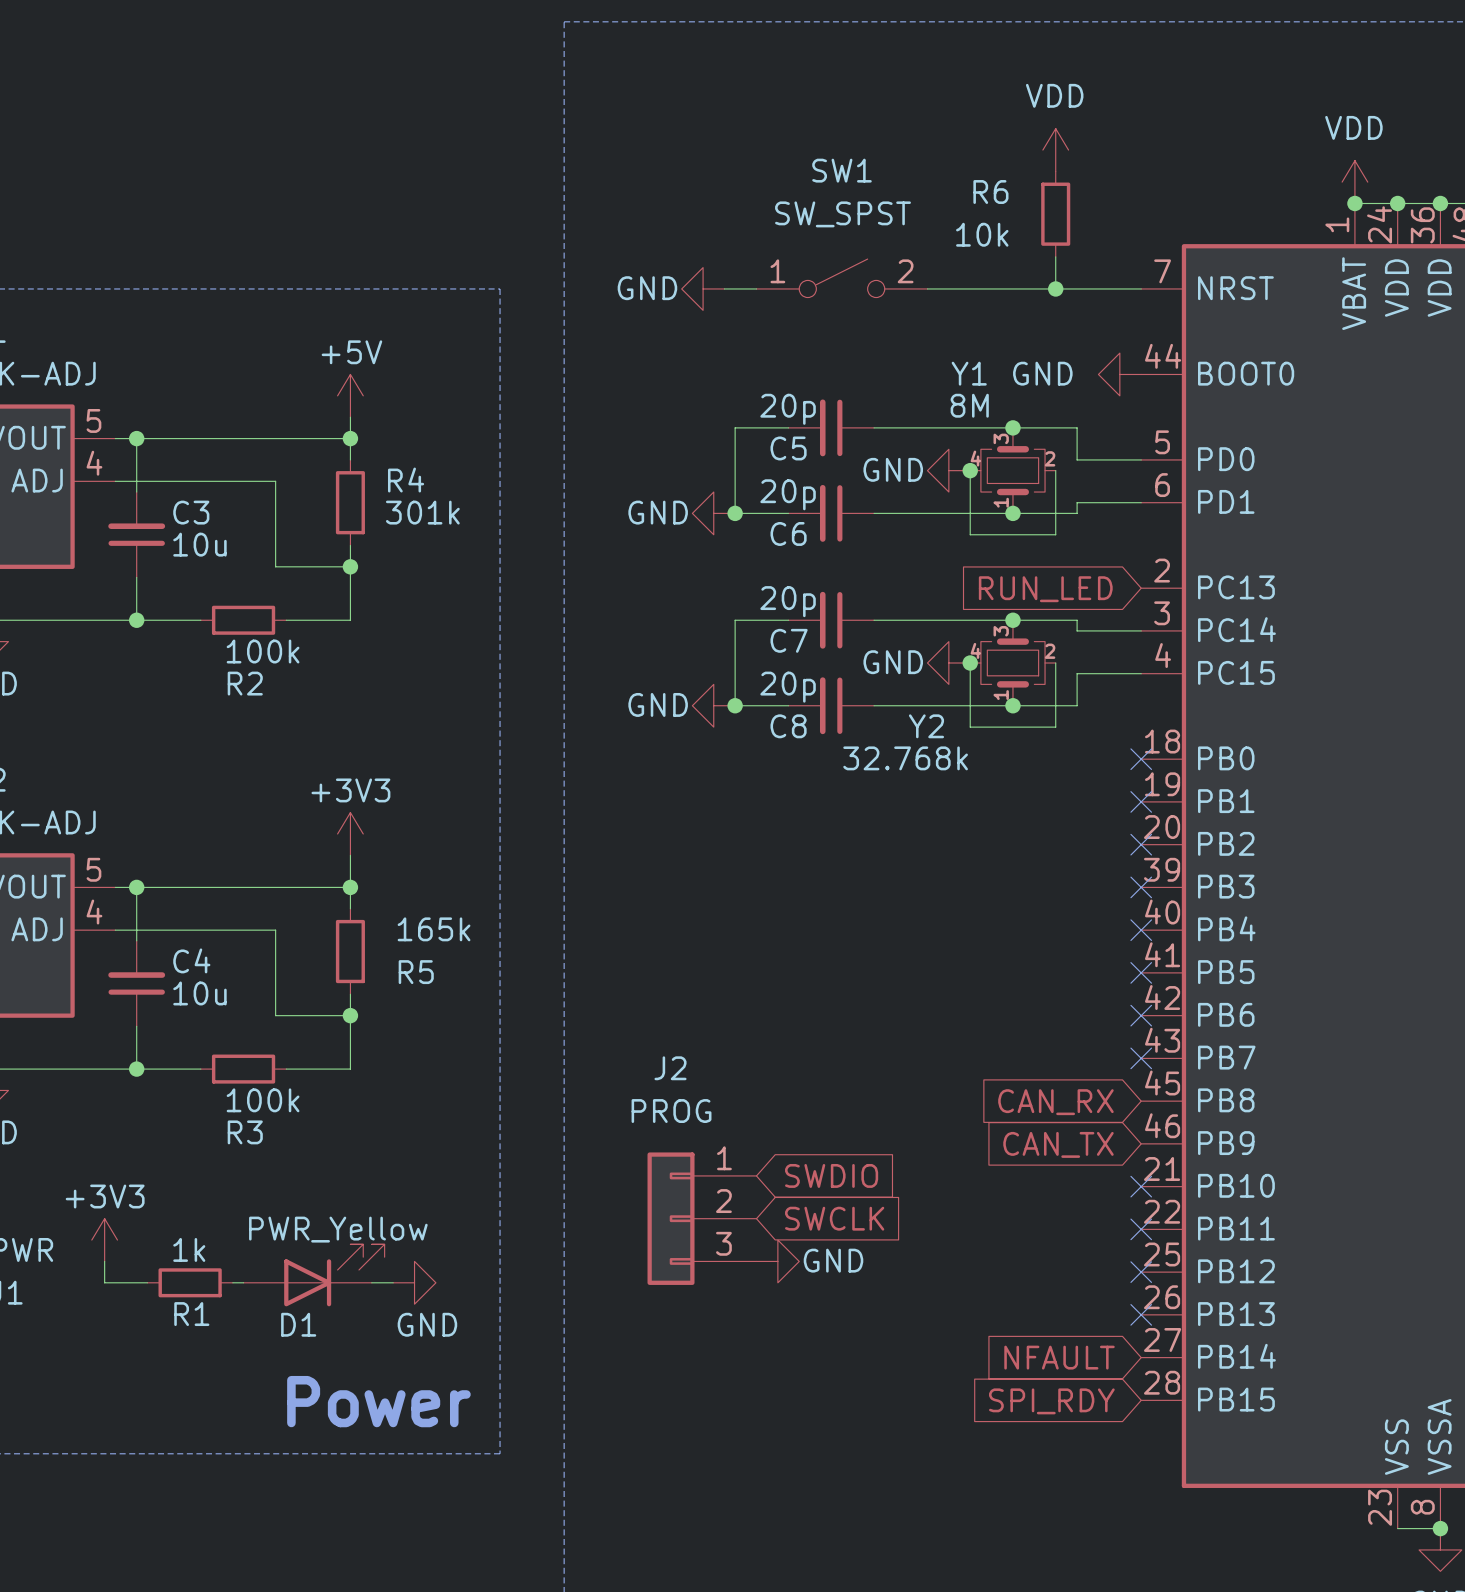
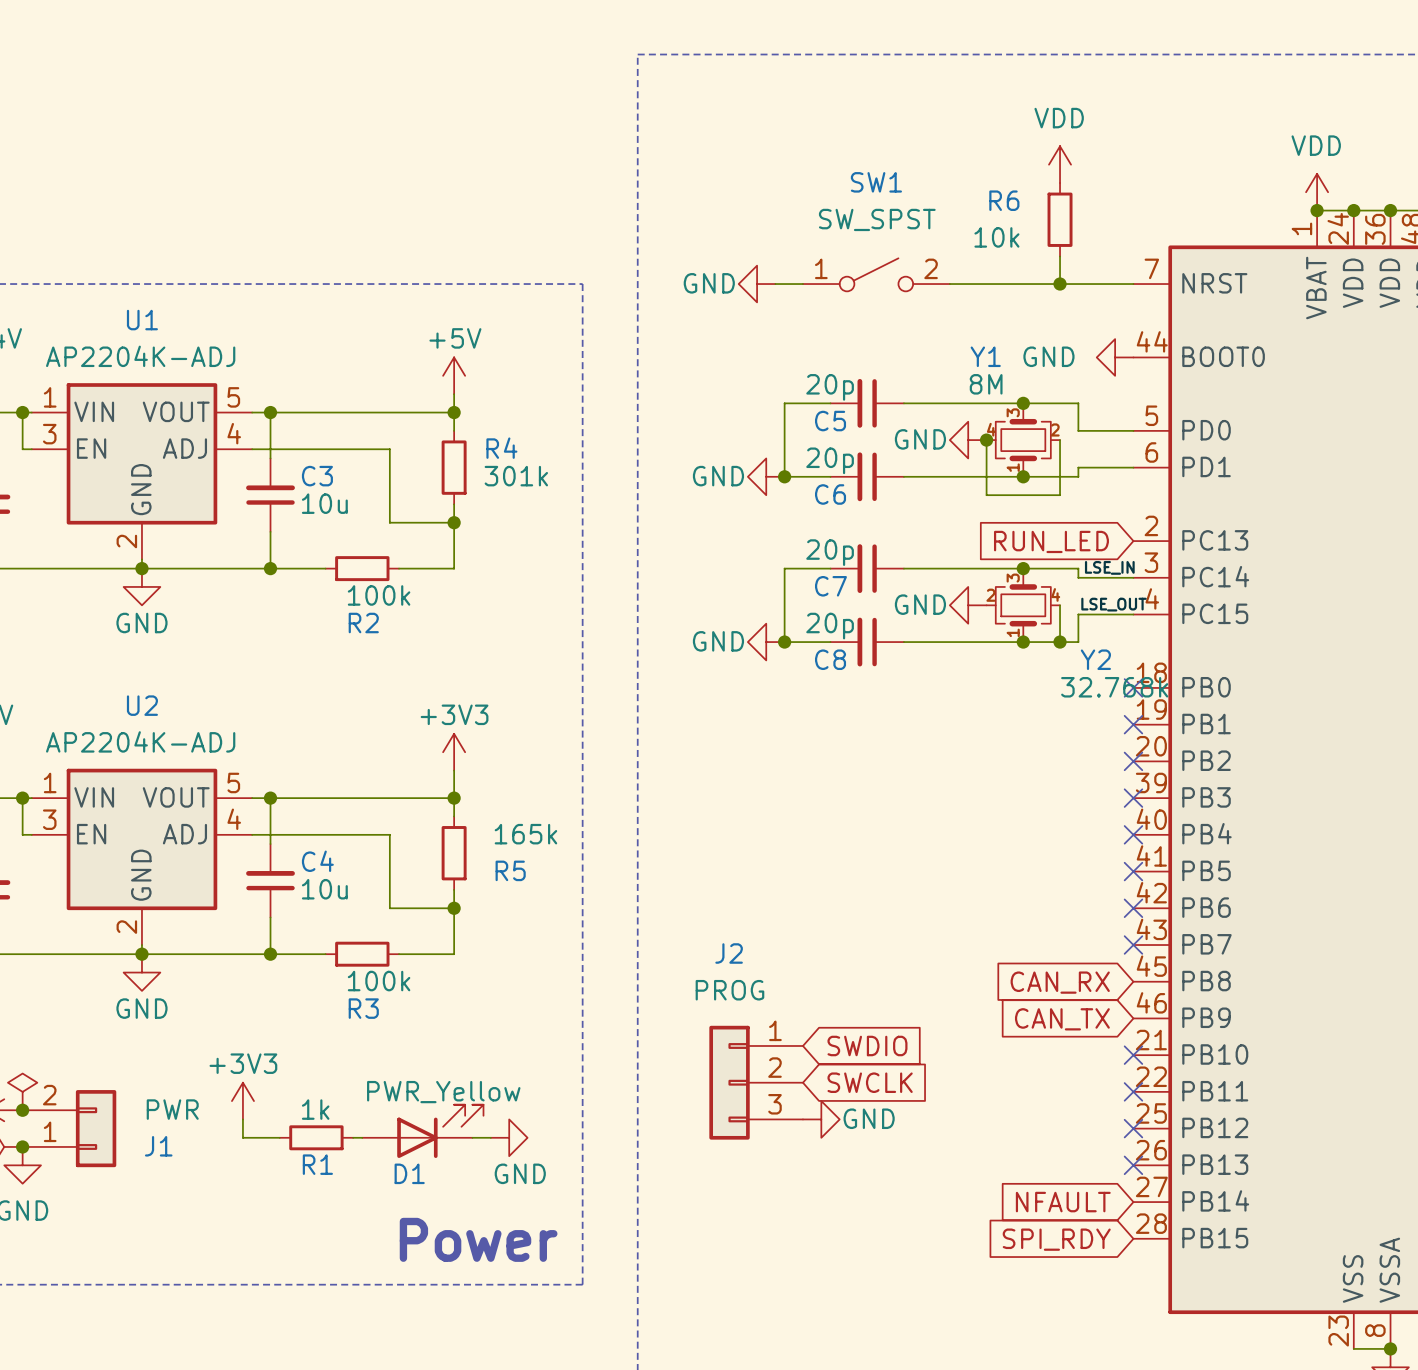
label: none -> LSE_IN (1109, 567)
label: none -> LSE_OUT (1113, 604)
wire: (970, 663) (970, 727) (1055, 727) (1055, 705) -> none
junction position: (970, 663) -> (1060, 642)
Y2 flip: as is (1012, 663) -> left-right (1023, 605)

